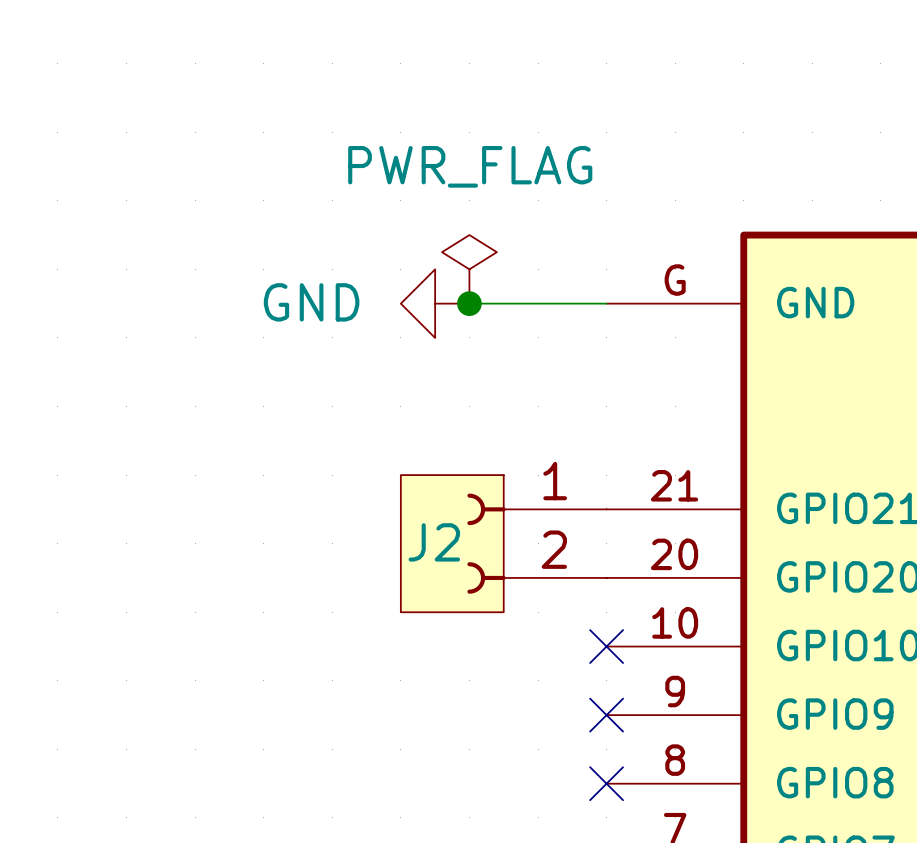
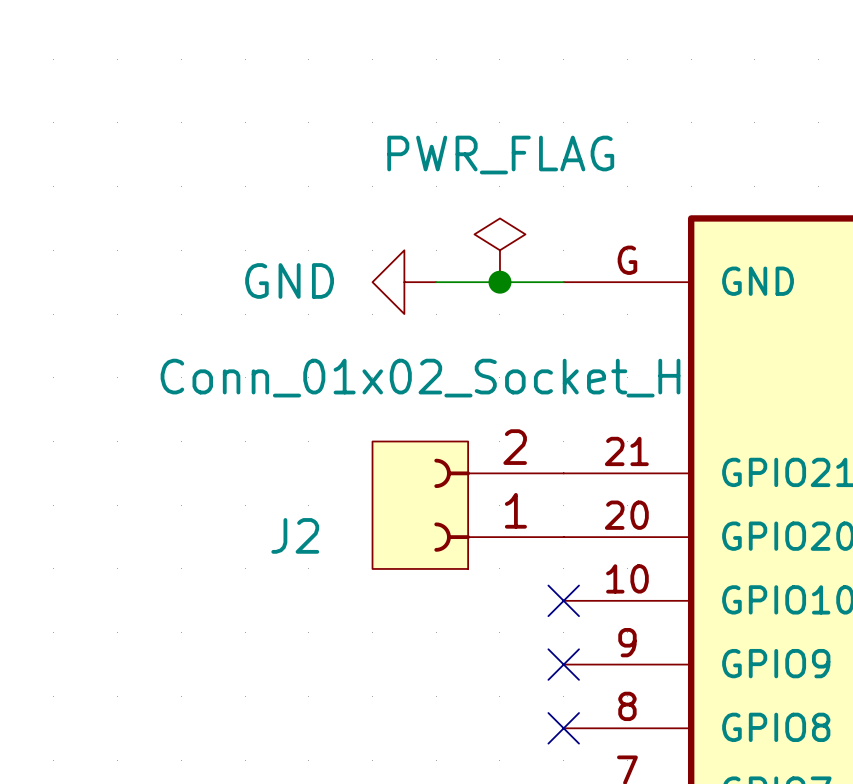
power symbol position: PWR_FLAG (469, 269) -> PWR_FLAG (499, 250)
junction position: (469, 303) -> (499, 282)
J2 value: none -> Conn_01x02_Socket_H (420, 378)
J2 name position: J2 (434, 542) -> J2 (295, 535)
J2 flip: as is (453, 543) -> up-down (421, 505)

